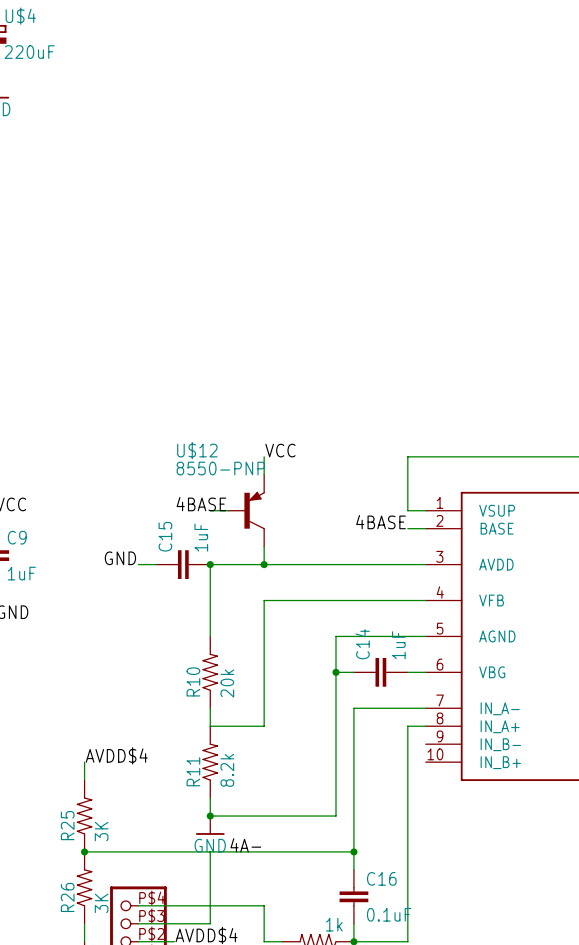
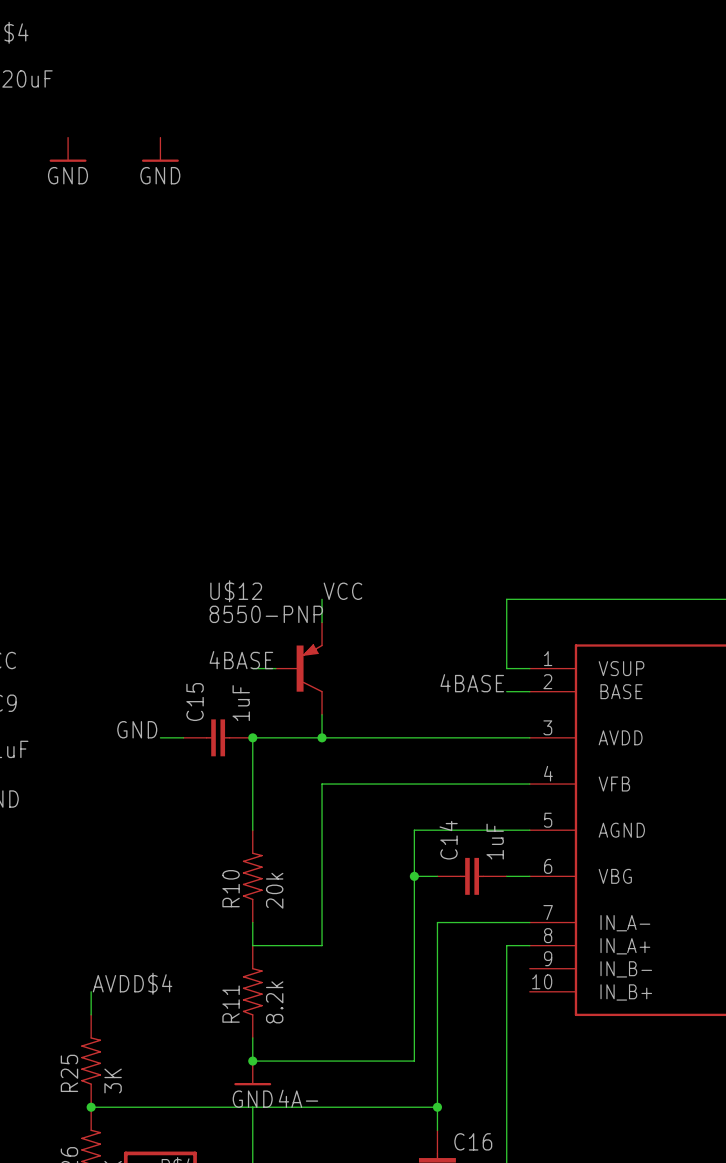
power symbol: none -> GND (68, 149)
power symbol: none -> GND (160, 149)

